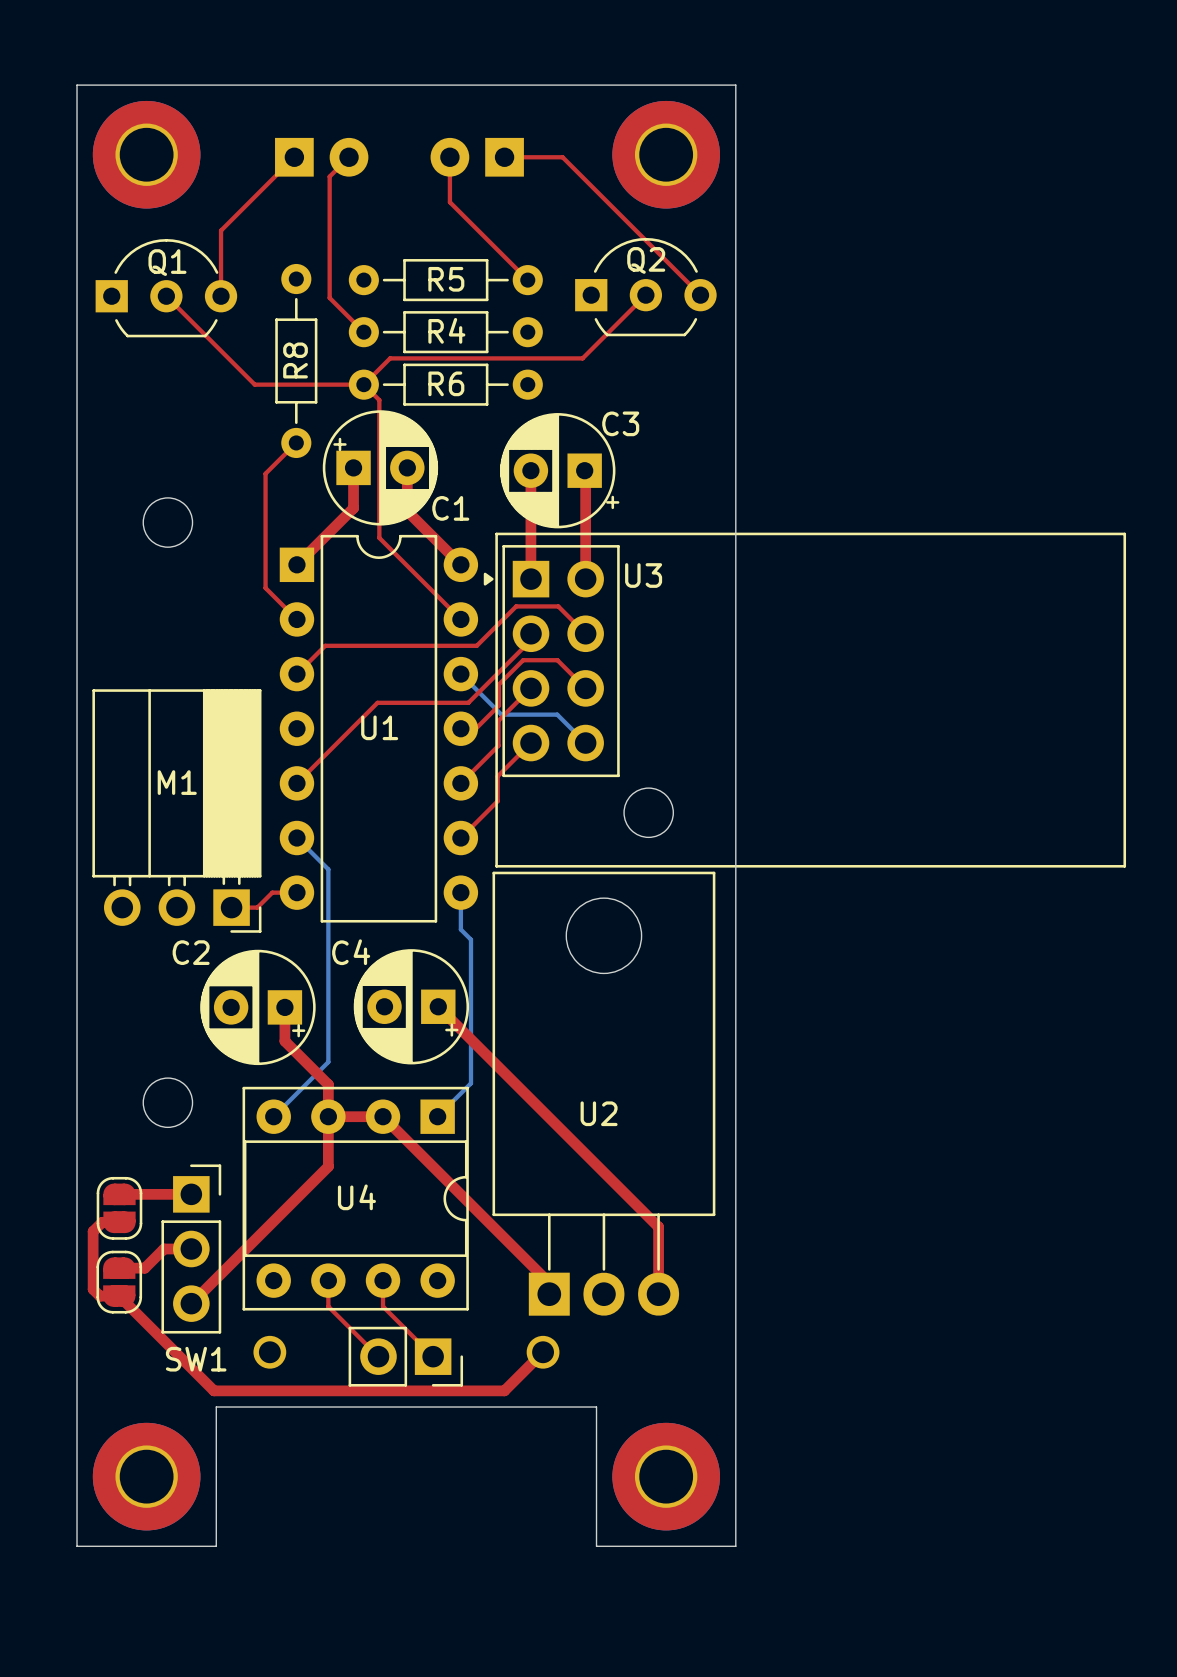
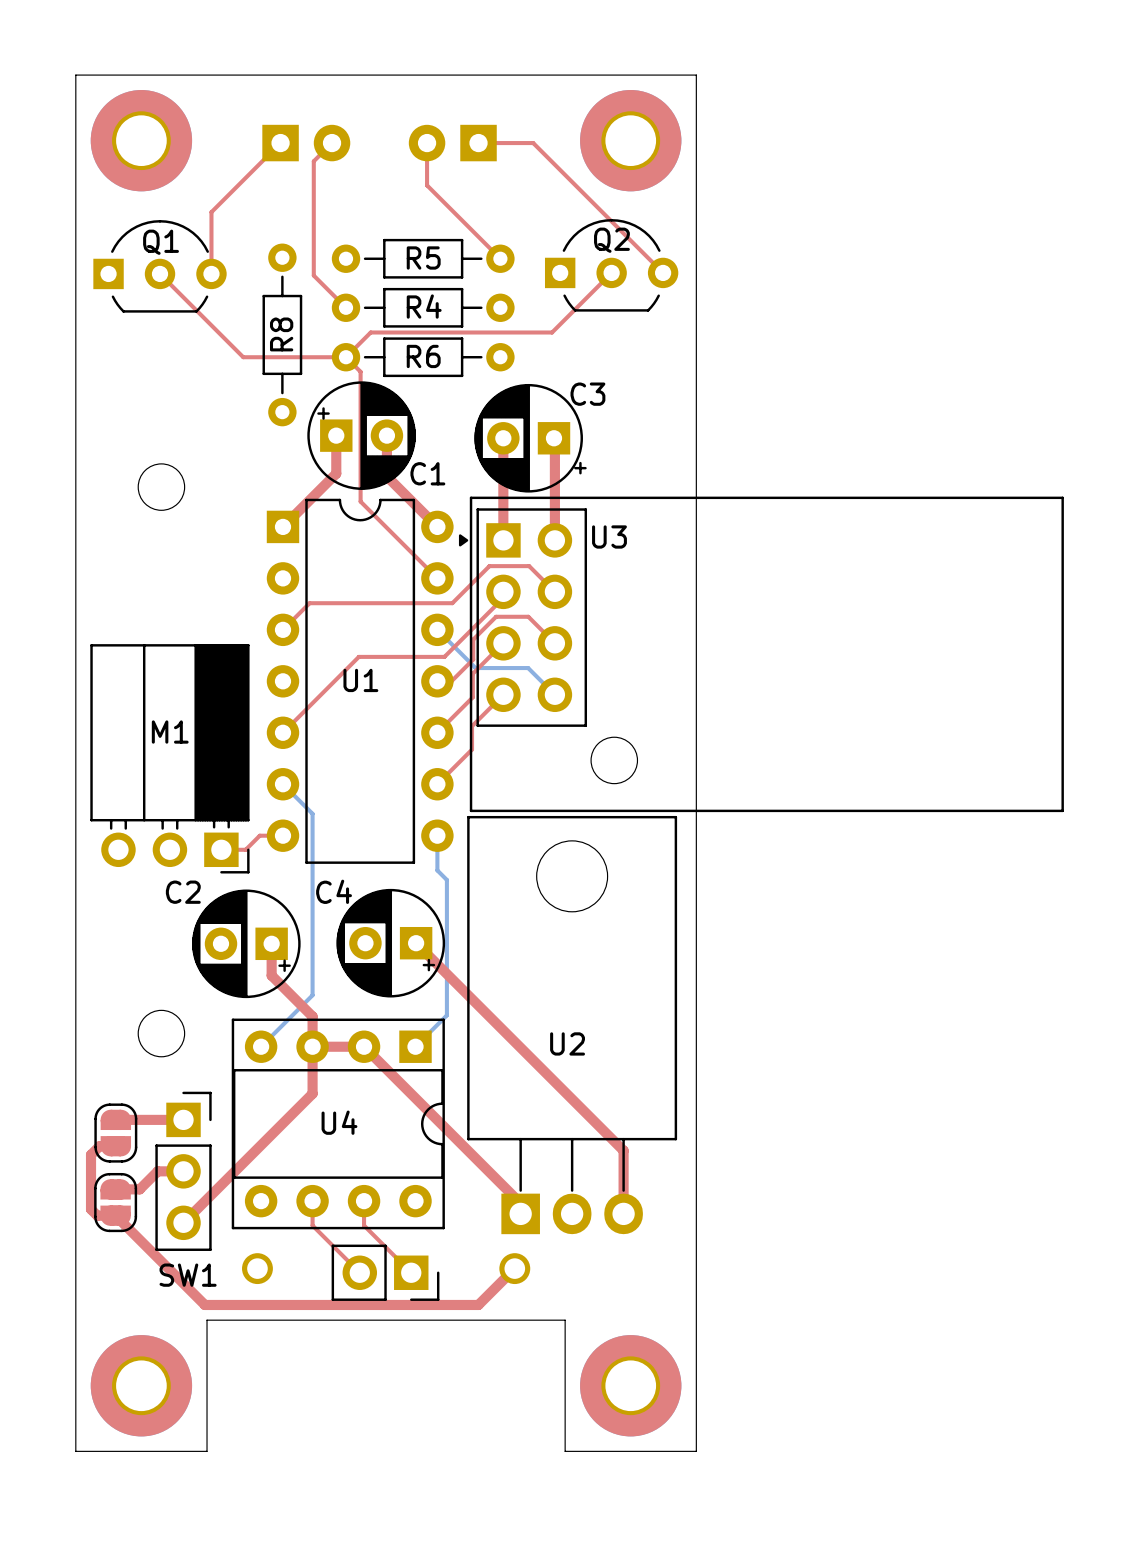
top track: (296, 442) (265, 473) (265, 588) (296, 619) -> none

